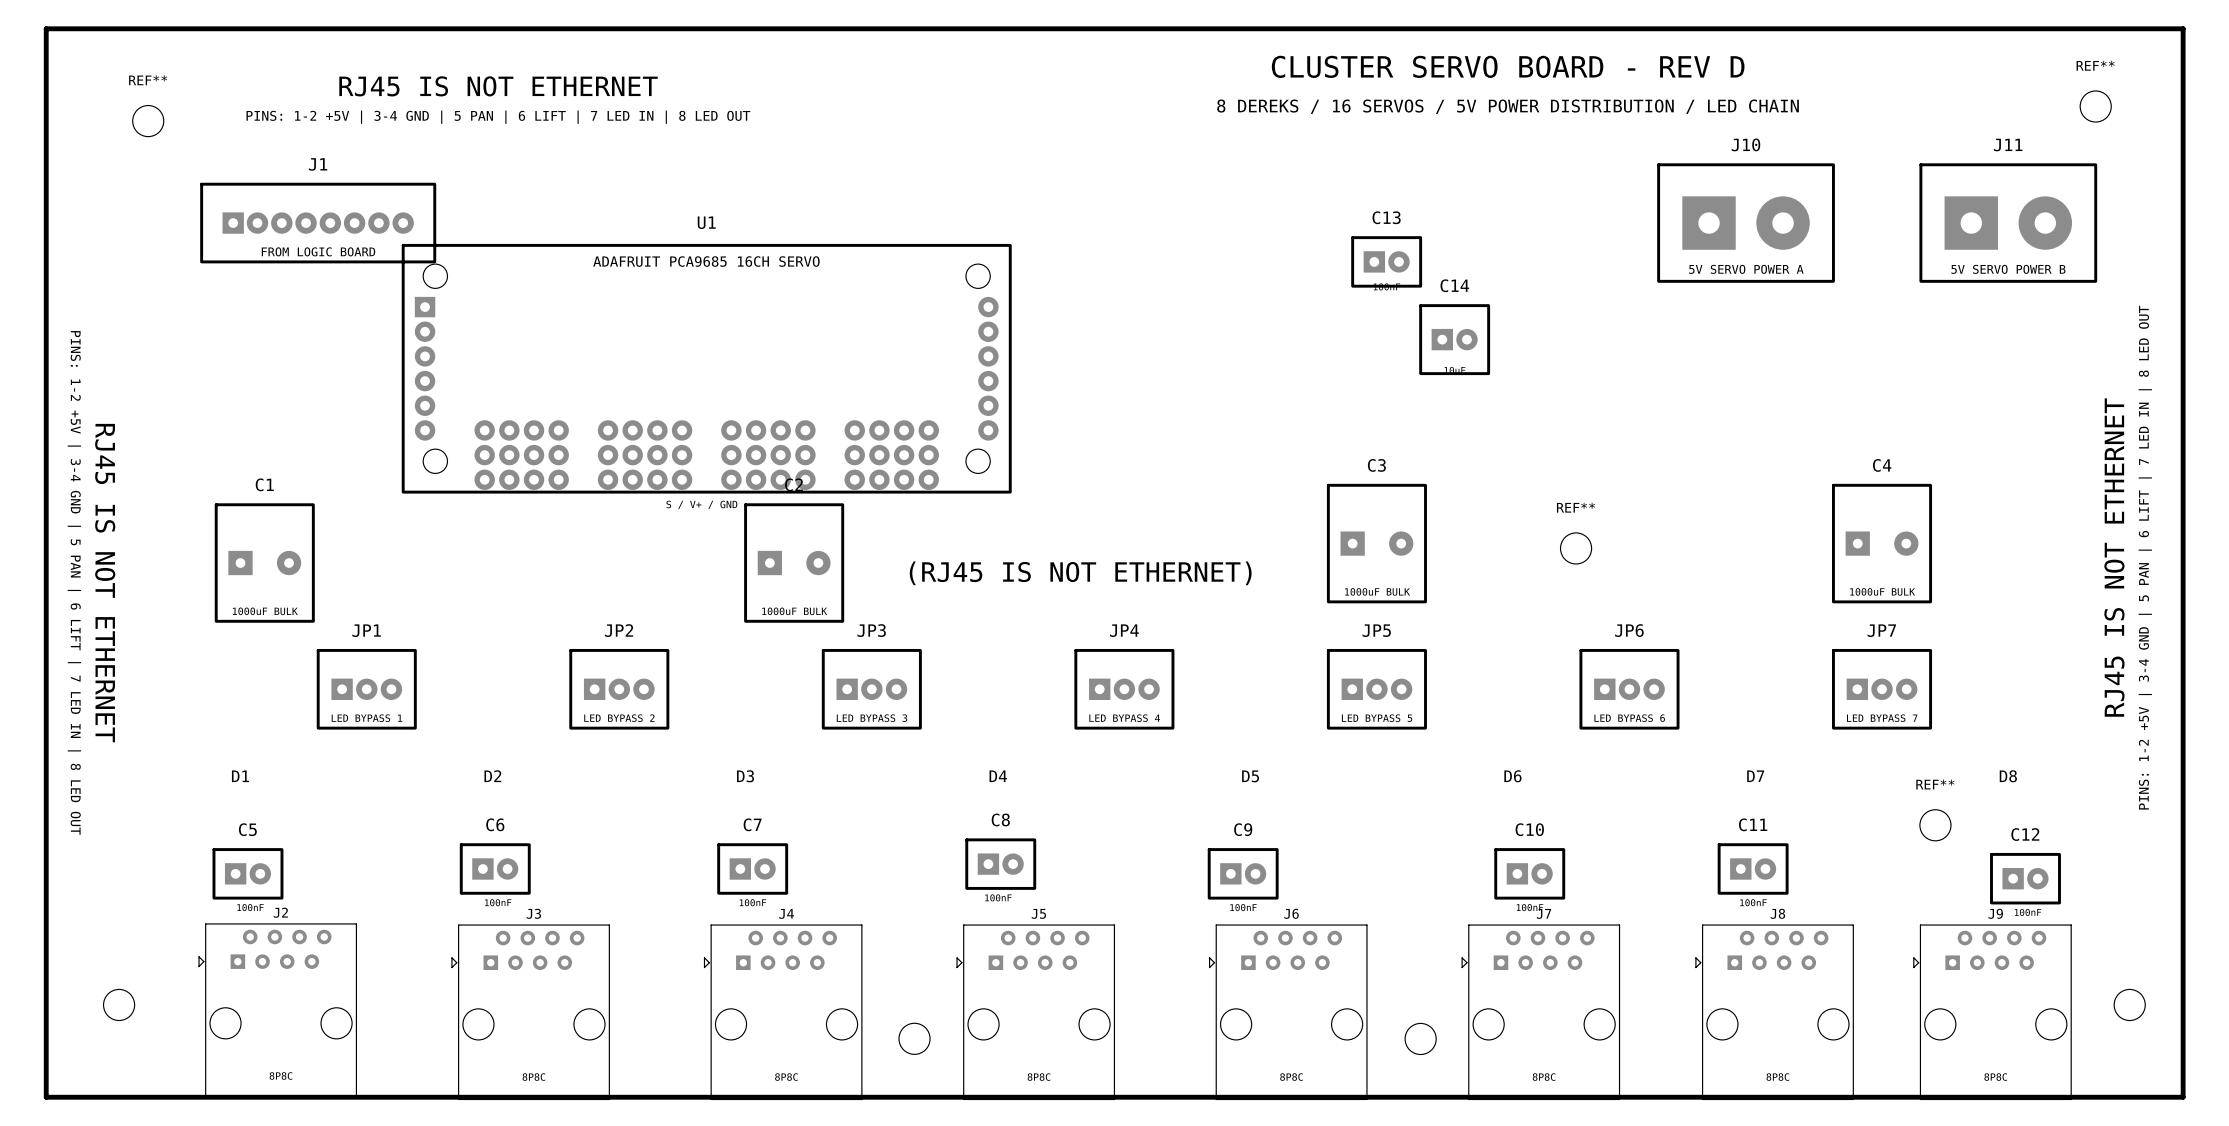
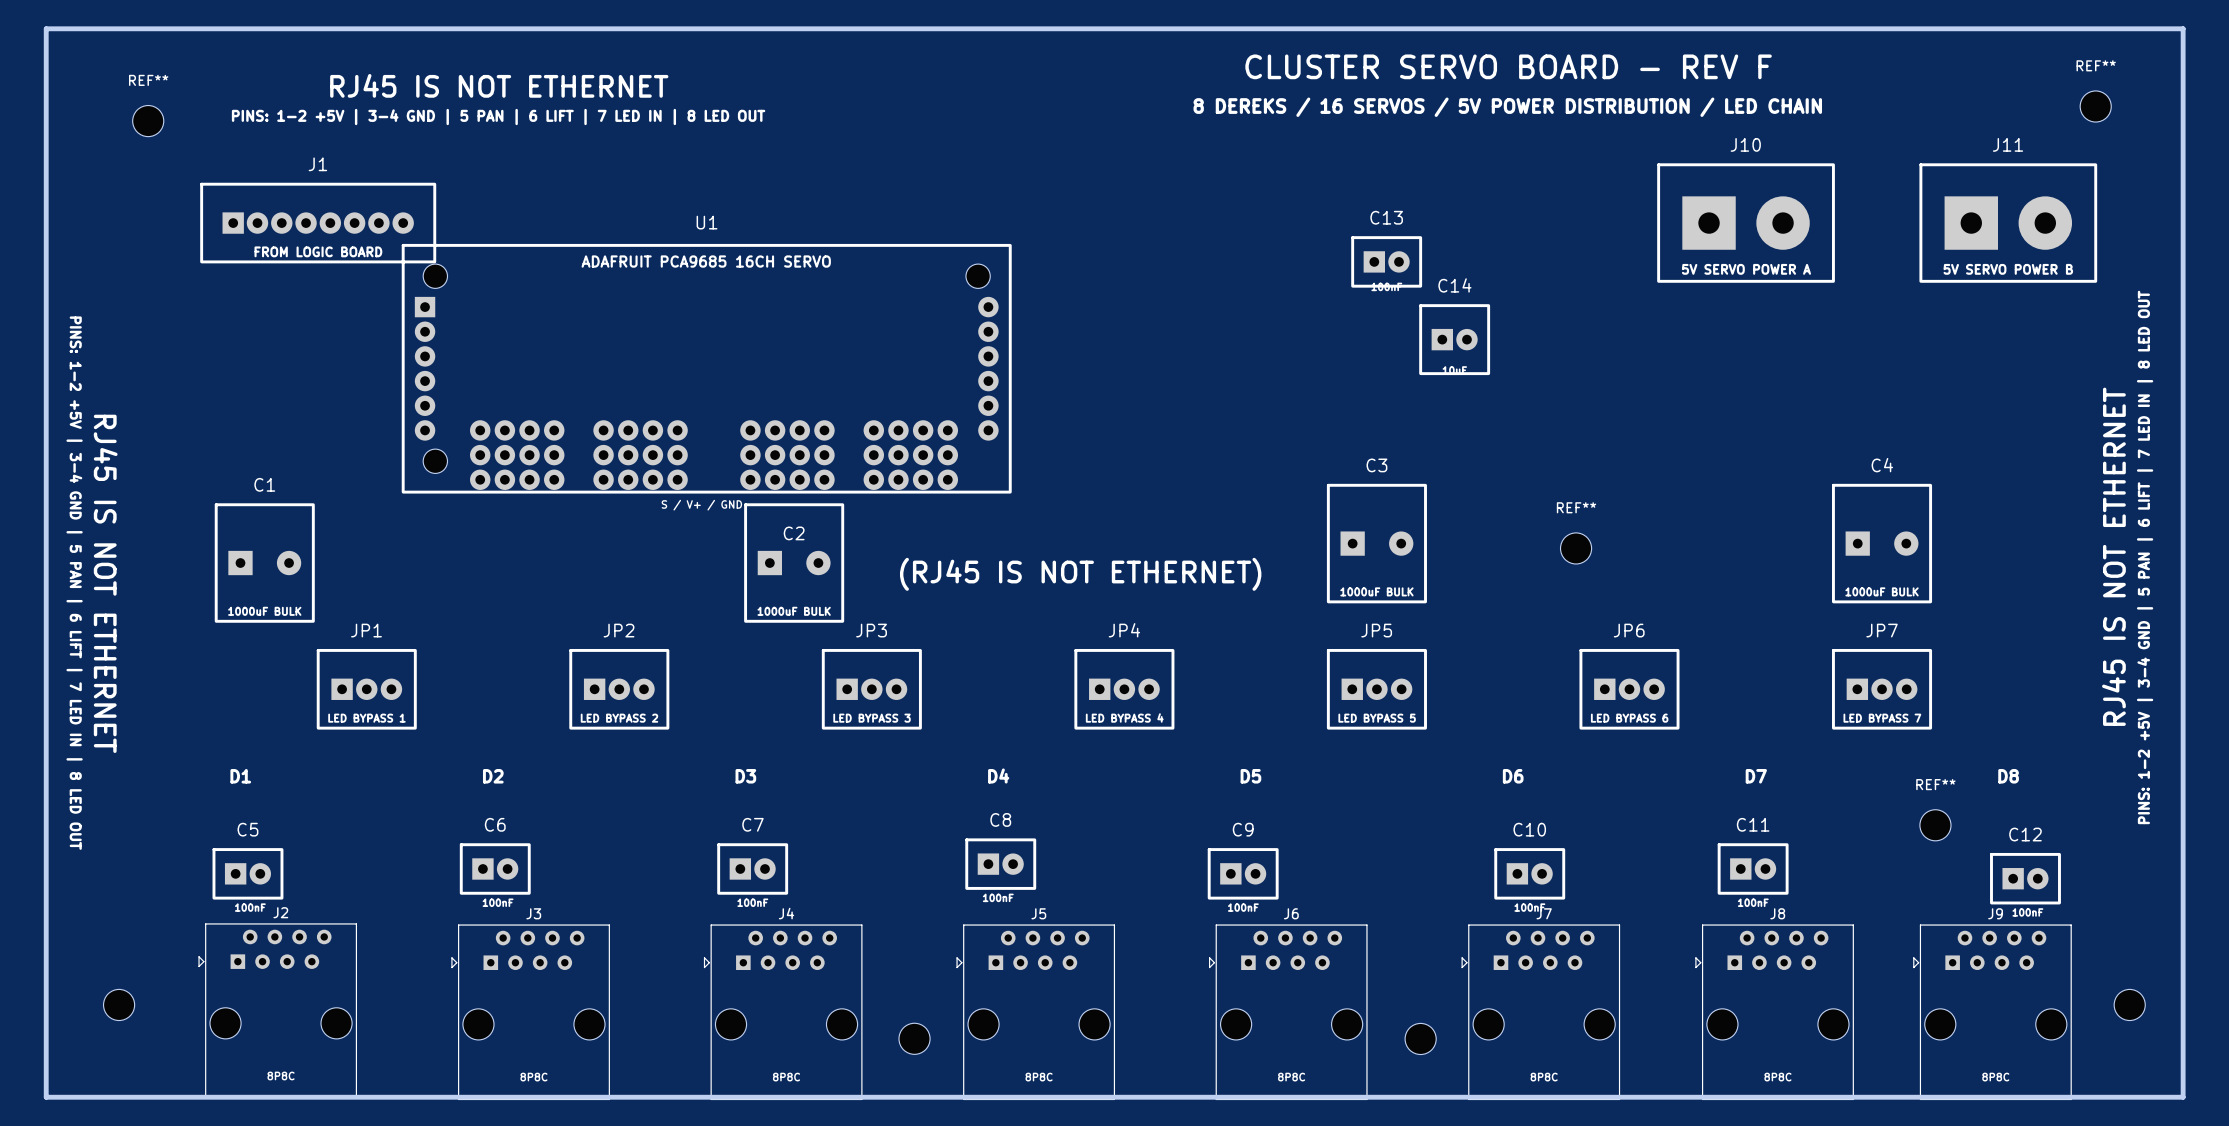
text: CLUSTER SERVO BOARD - REV D (1508, 66) -> CLUSTER SERVO BOARD - REV F (1508, 66)
U1 footprint: [401, 243, 1012, 494] -> [401, 243, 1012, 494]
C2 name position: C2 (794, 484) -> C2 (794, 533)

